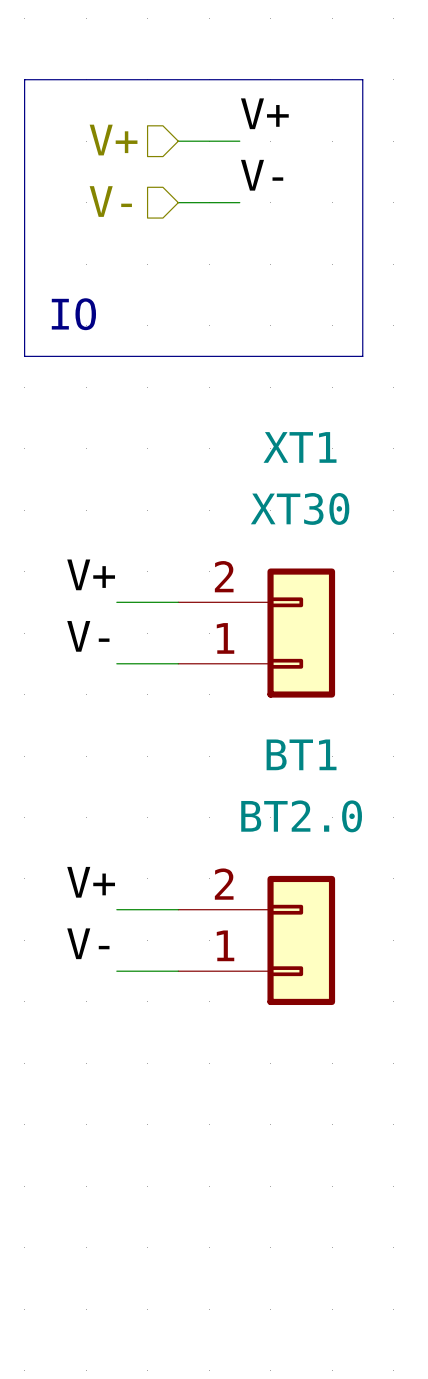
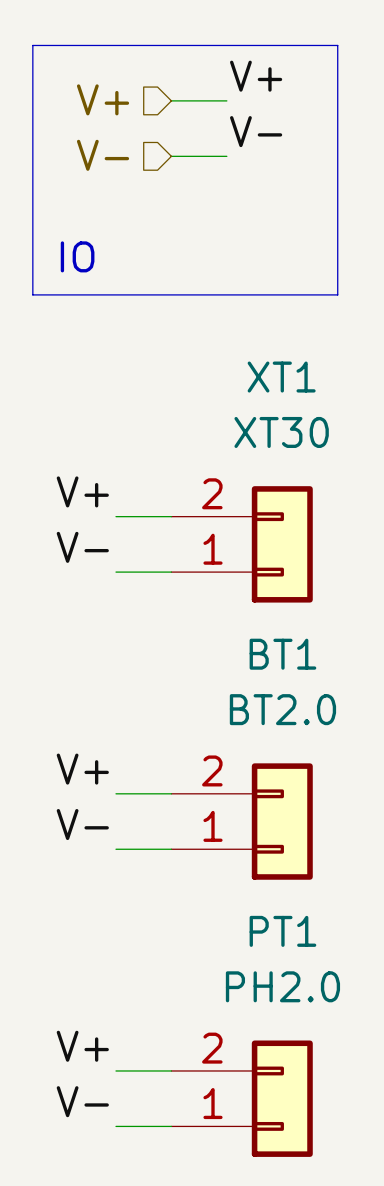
label: none -> V+ (82, 1046)
wire: none -> (115, 1070) (171, 1070)
PT1: none -> PH2.0 (242, 1098)
label: none -> V- (82, 1101)
wire: none -> (115, 1126) (171, 1126)

